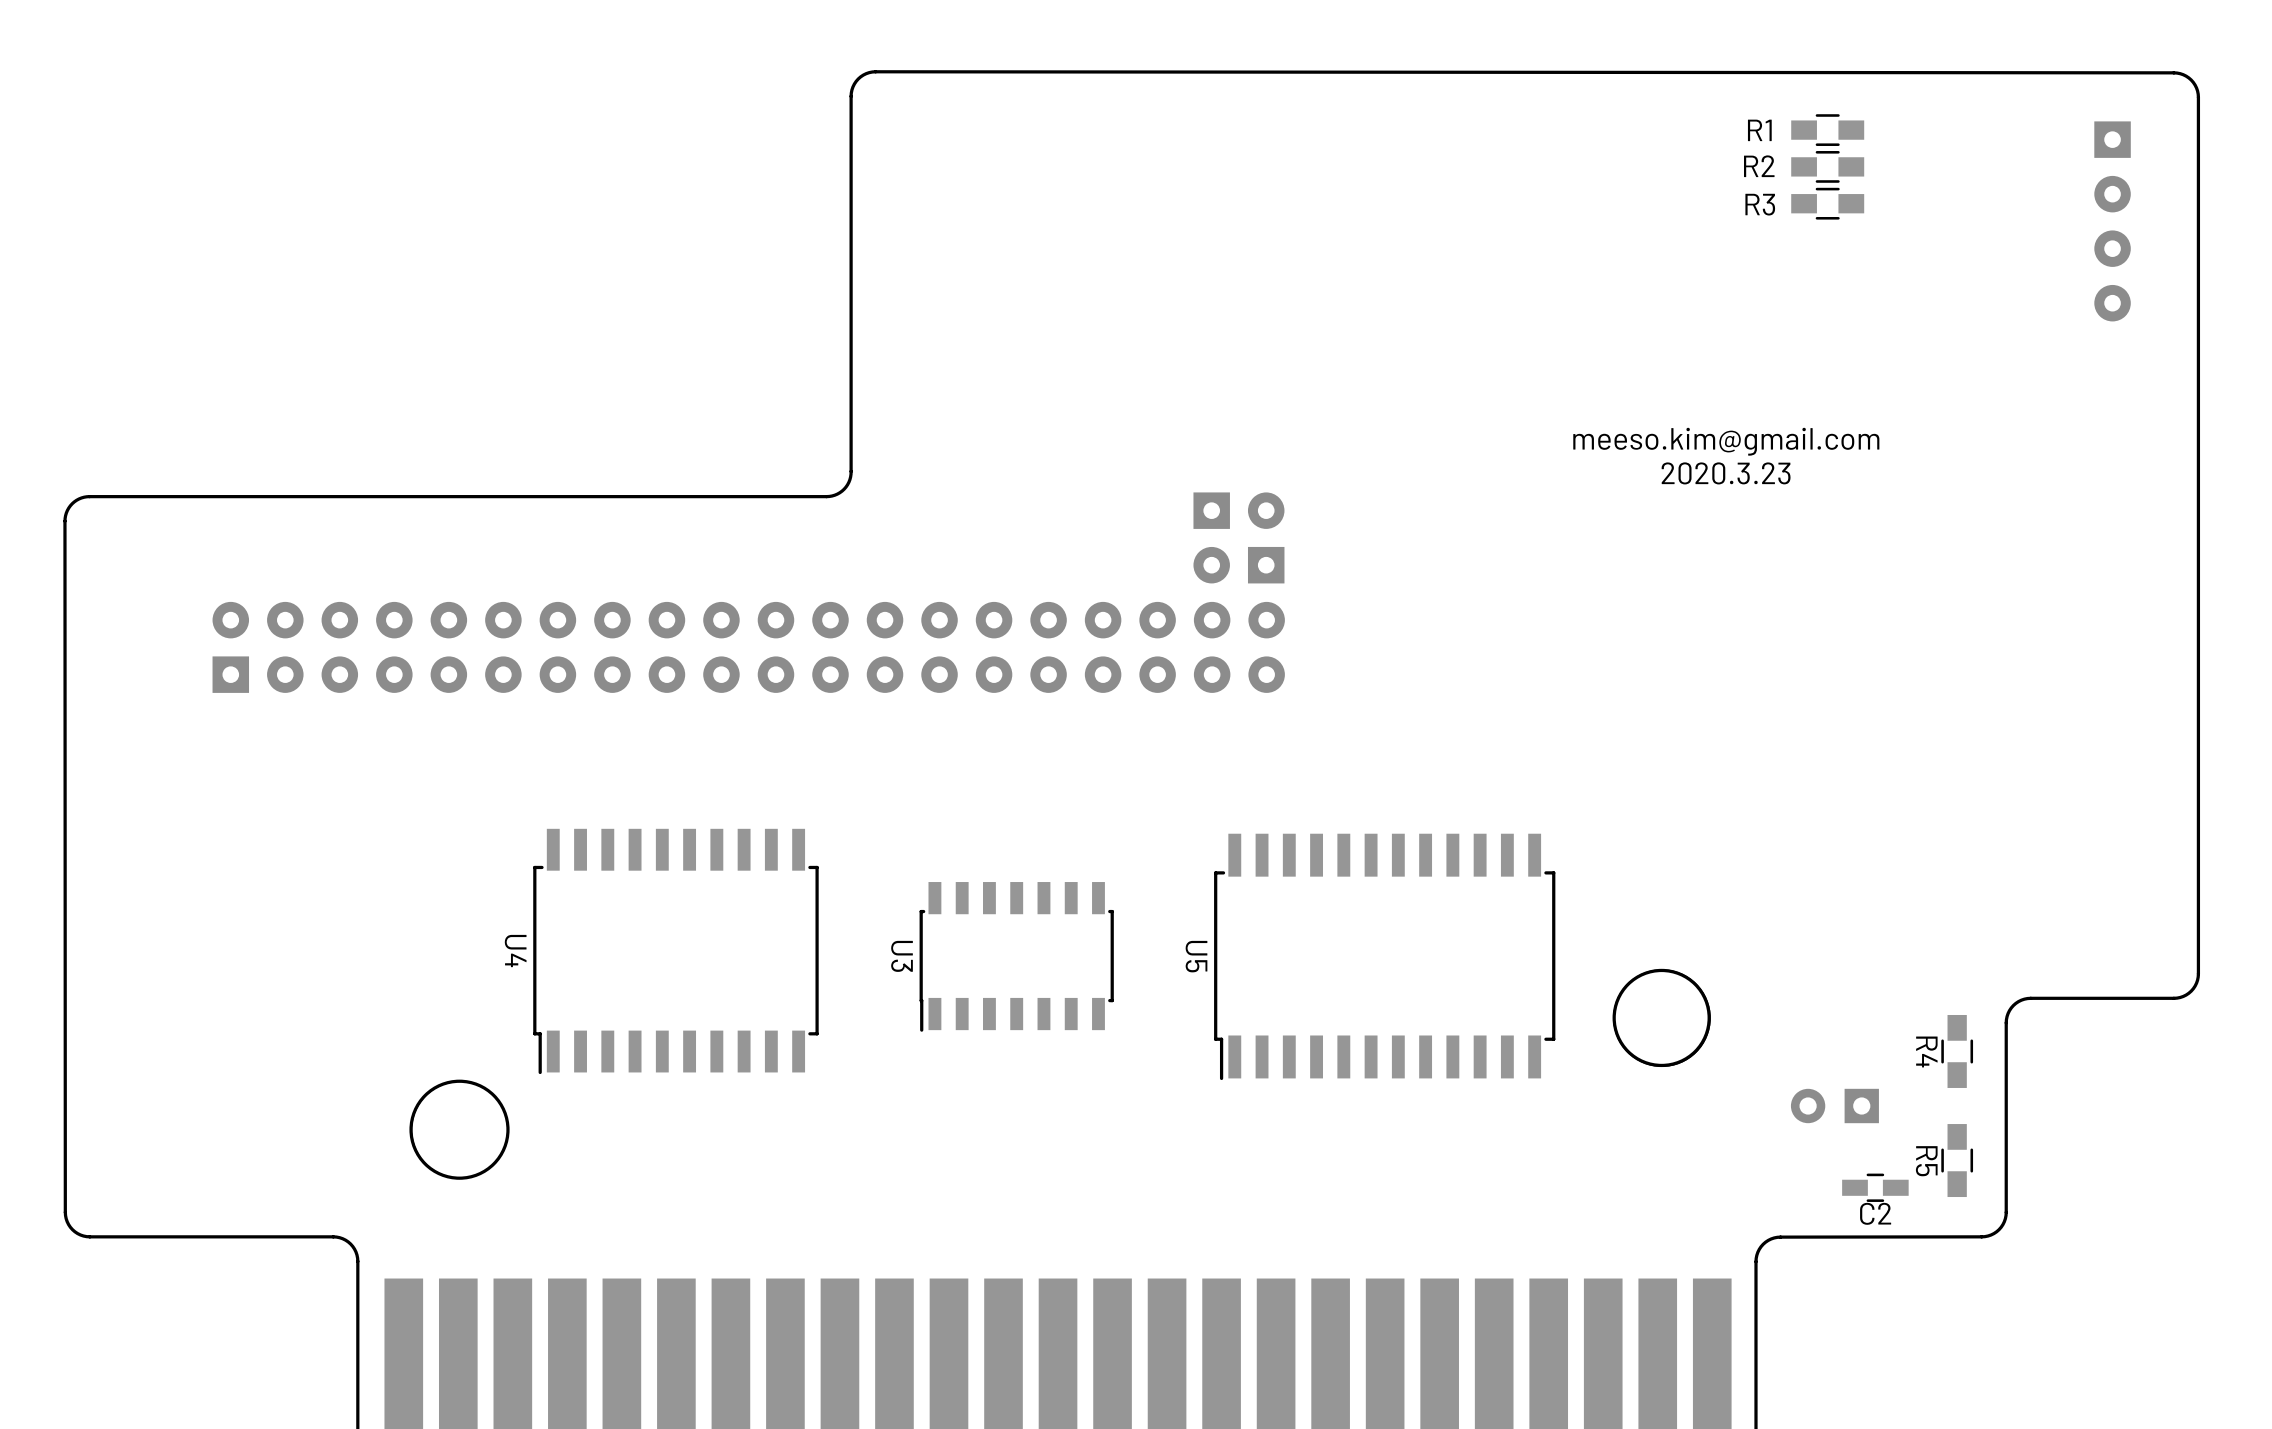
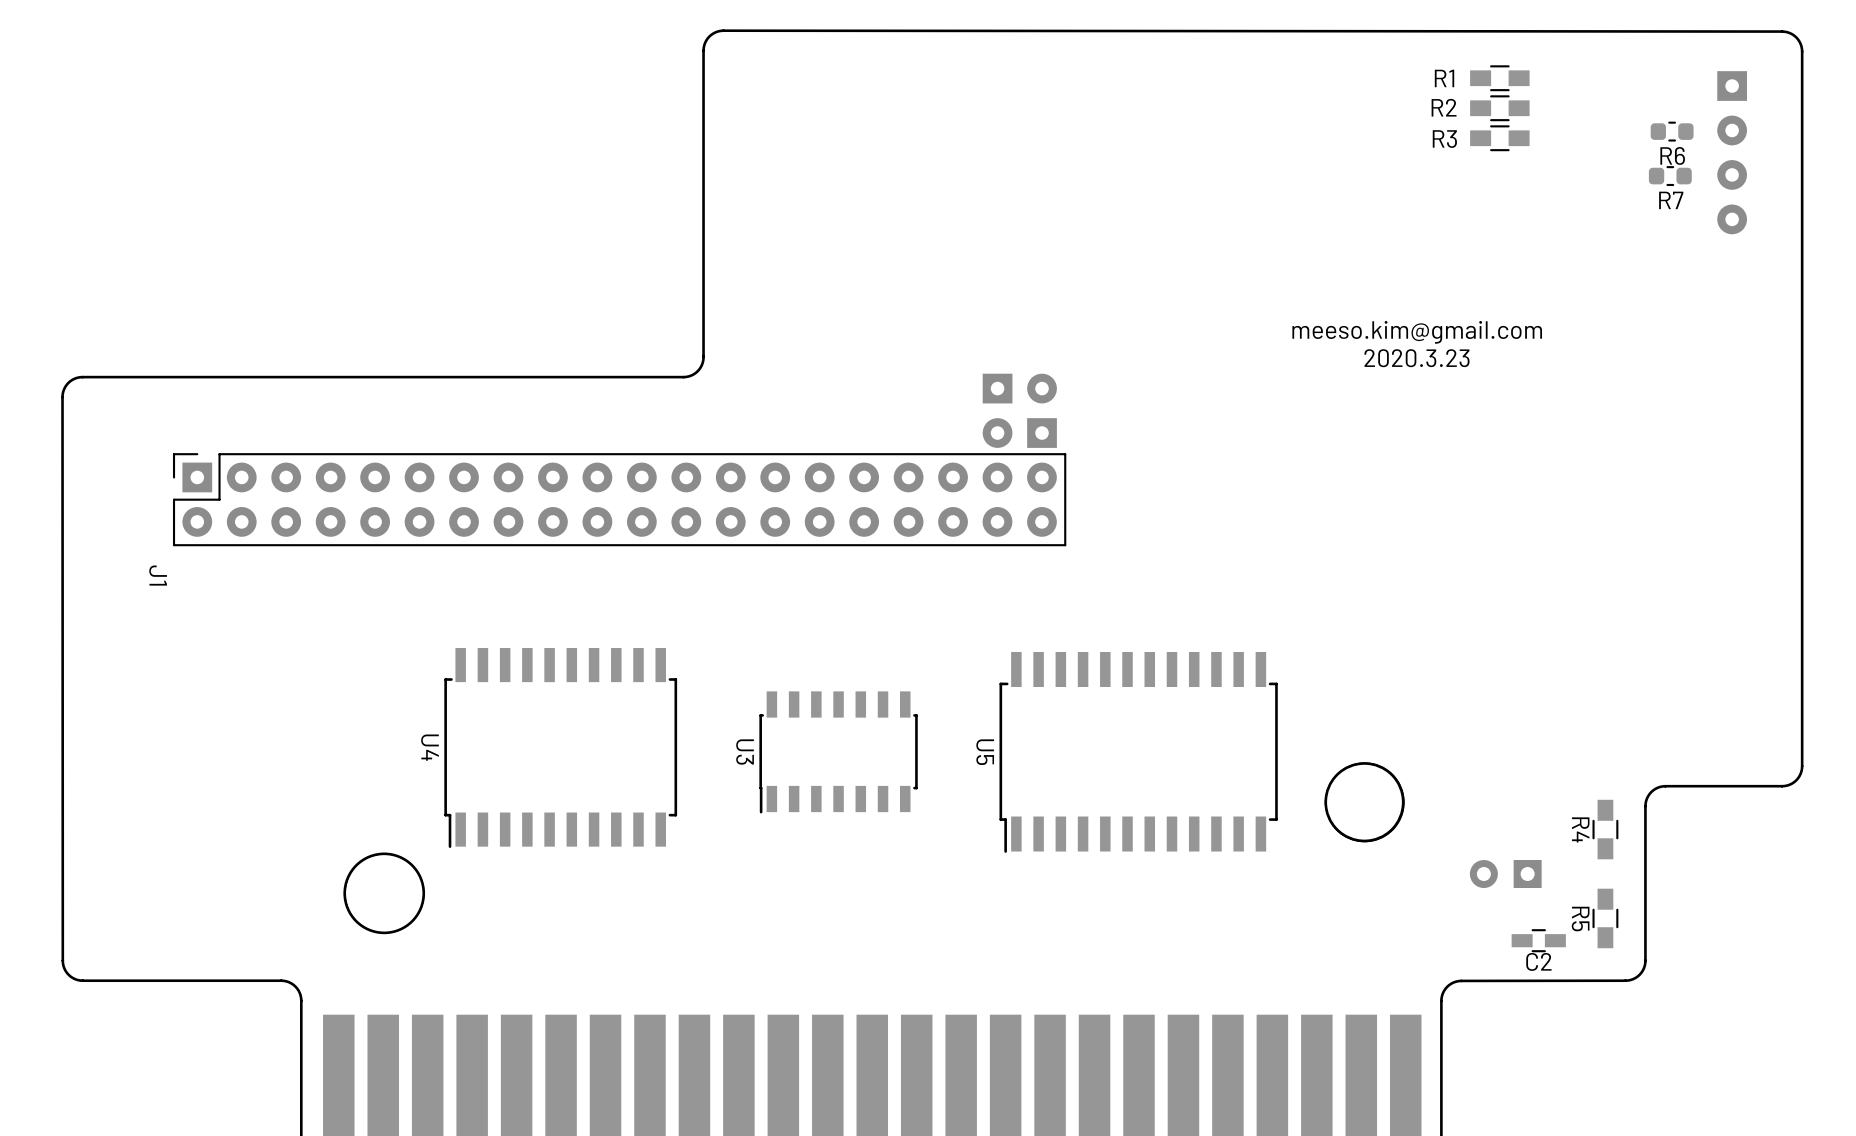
R6: none -> (1672, 131)
R7: none -> (1670, 176)
J1 side: top (748, 647) -> bottom (619, 499)

